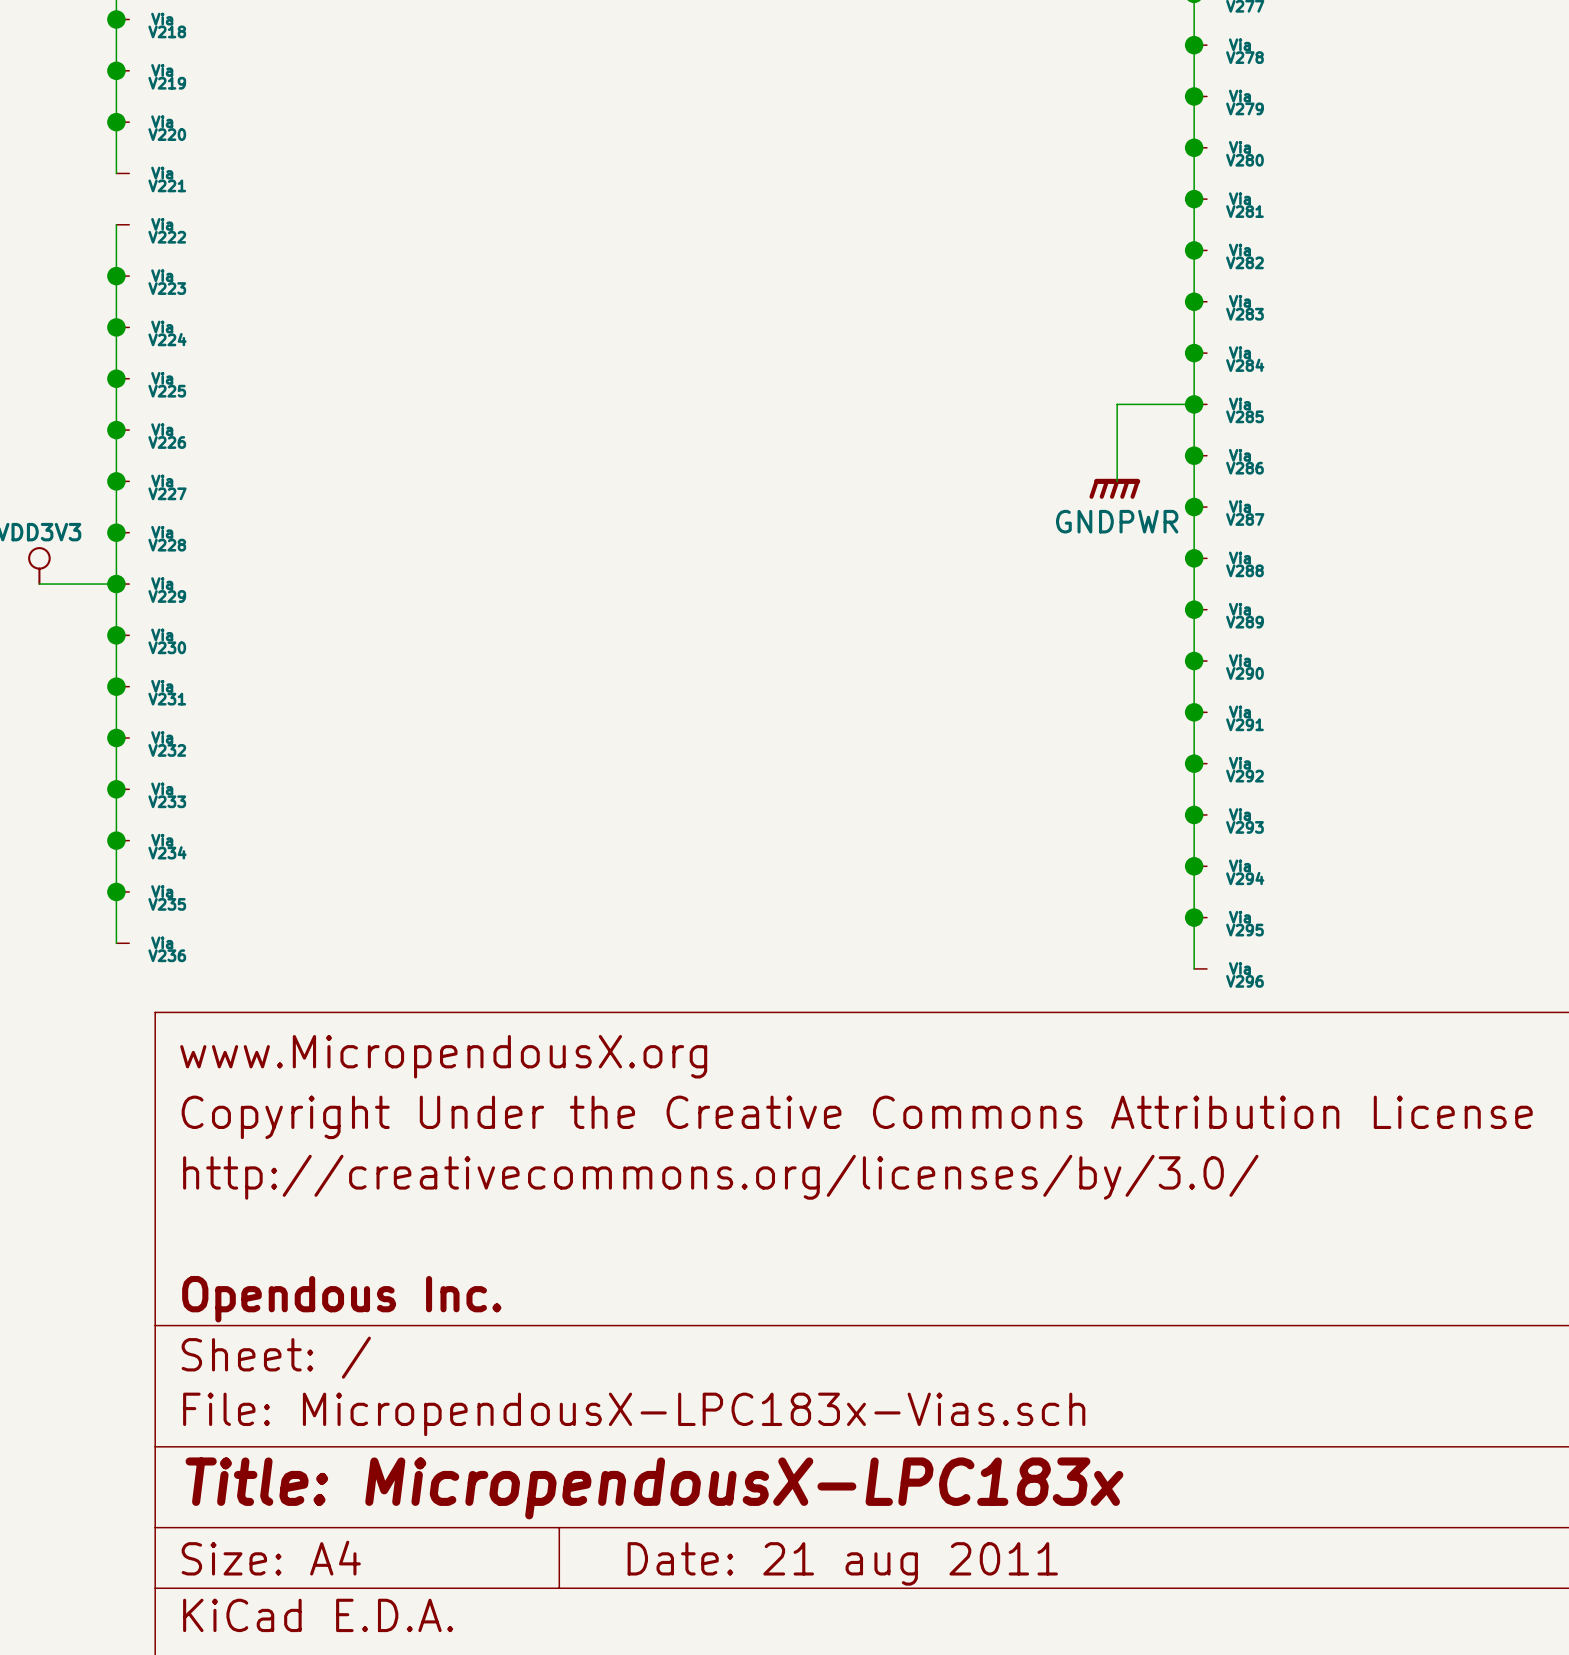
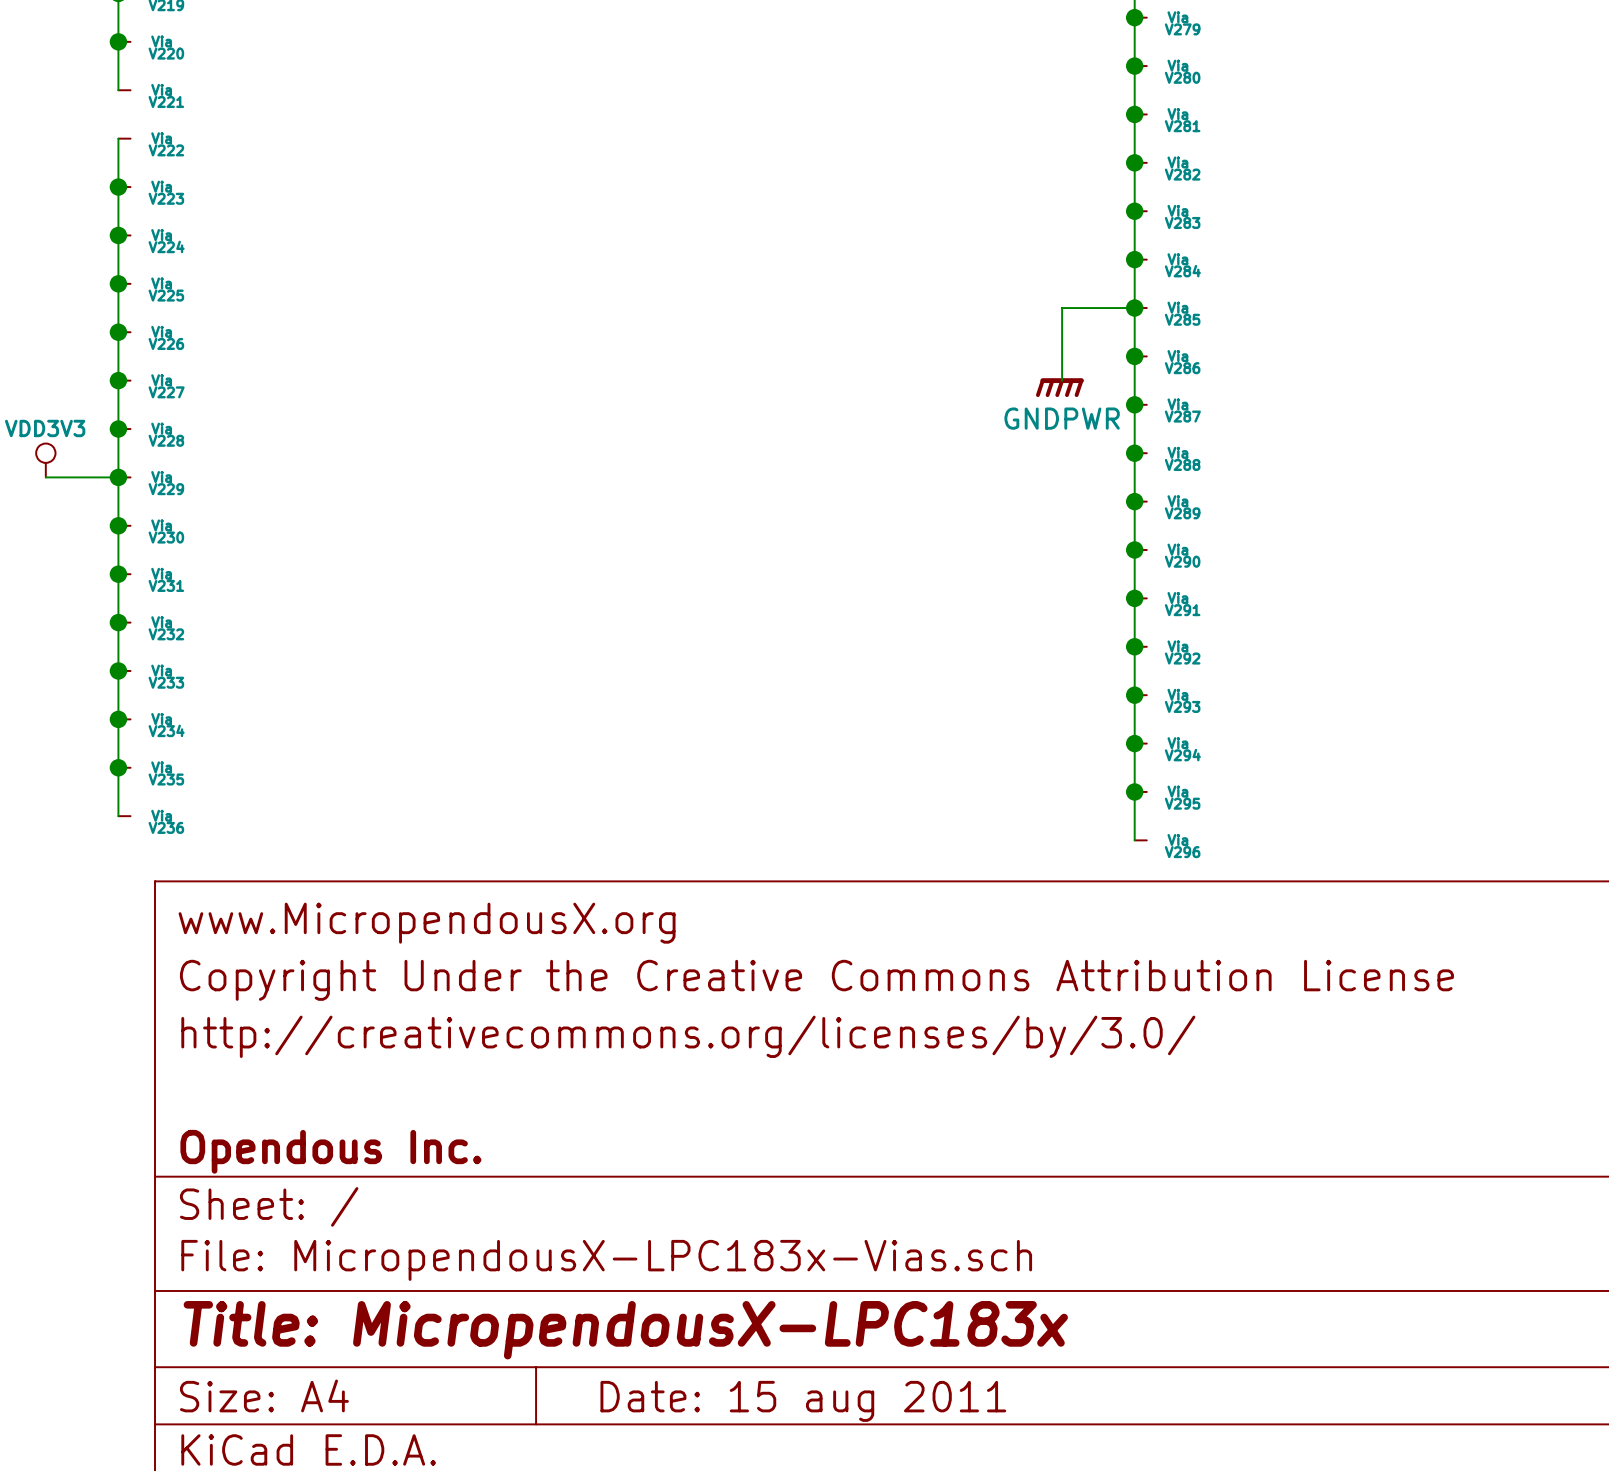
title block: Date: 21 aug 2011 (842, 1563) -> Date: 15 aug 2011 (803, 1401)

